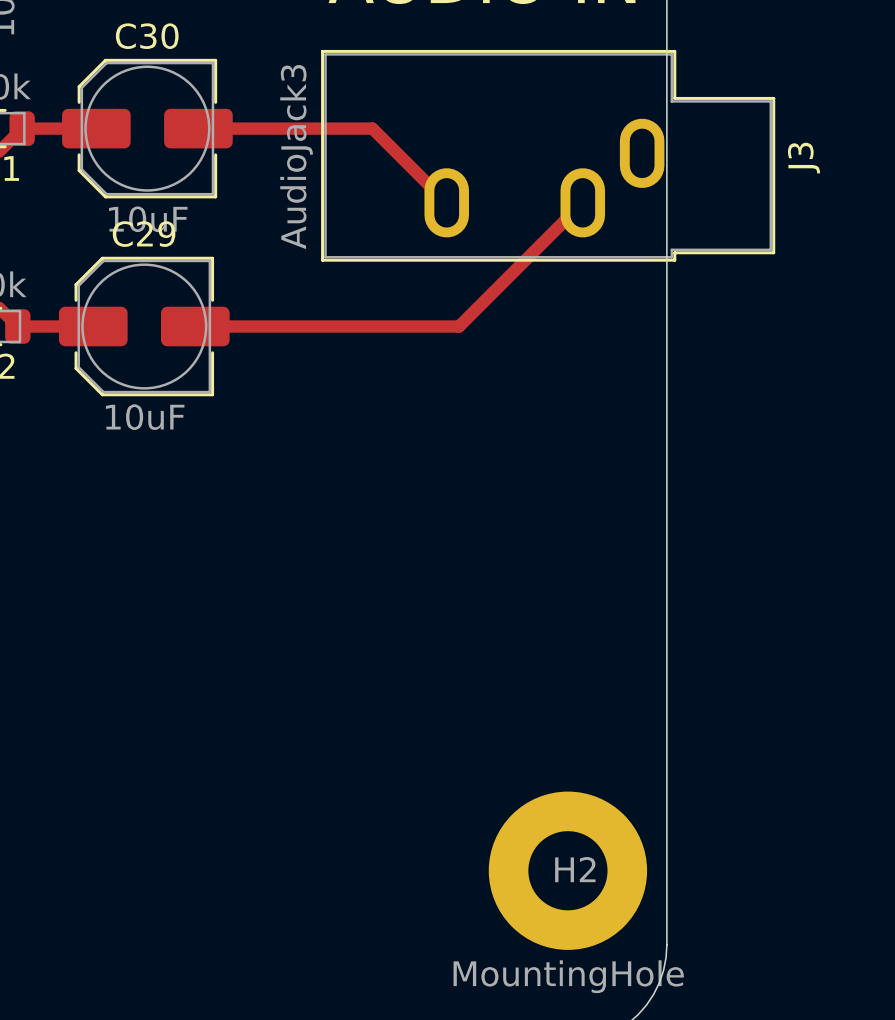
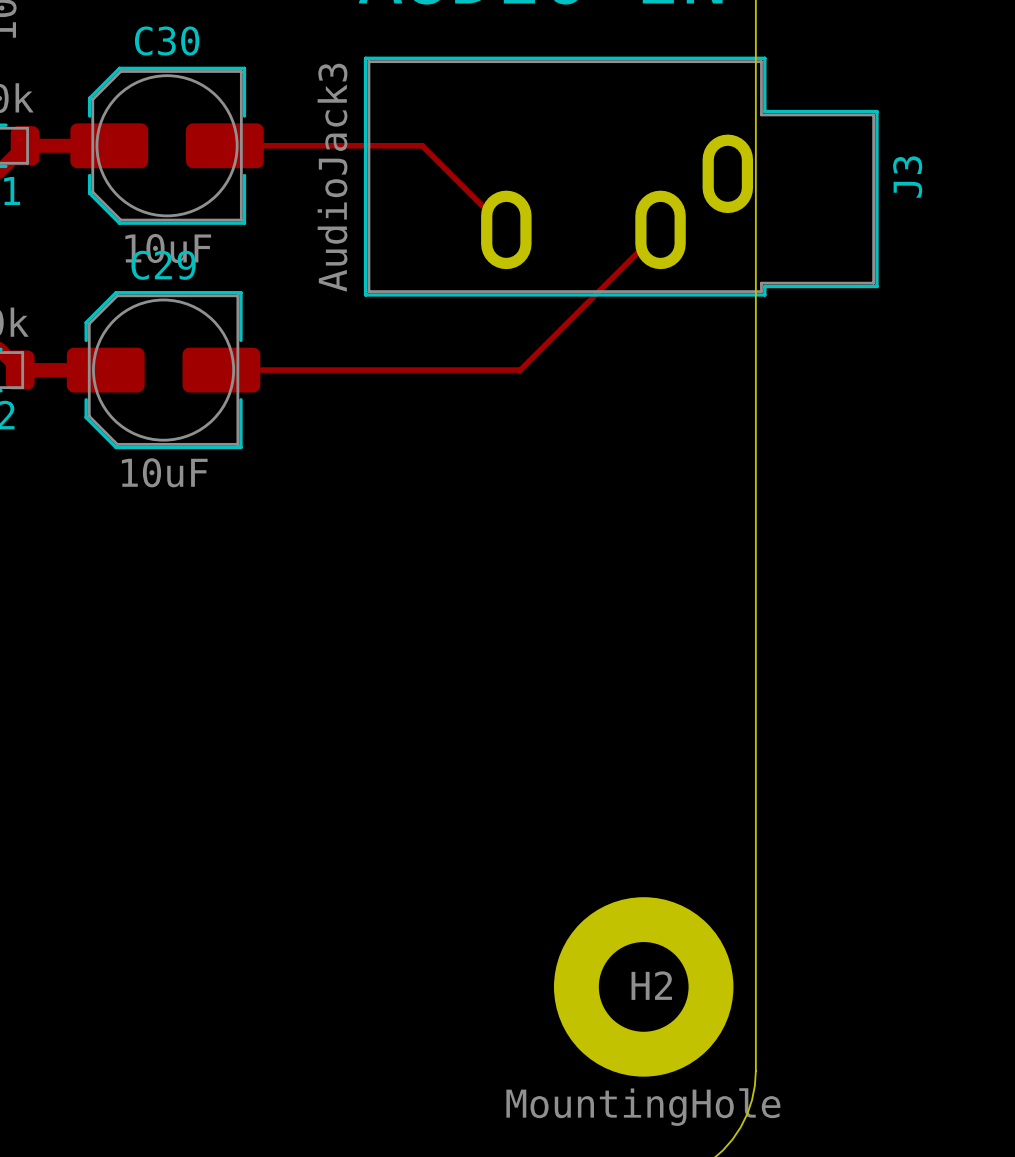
top track width: thick (198, 128) (372, 128) (446, 202) -> thin (224, 145) (422, 145) (506, 229)
top track width: thick (582, 202) (459, 326) (195, 326) -> thin (660, 229) (520, 370) (221, 370)

